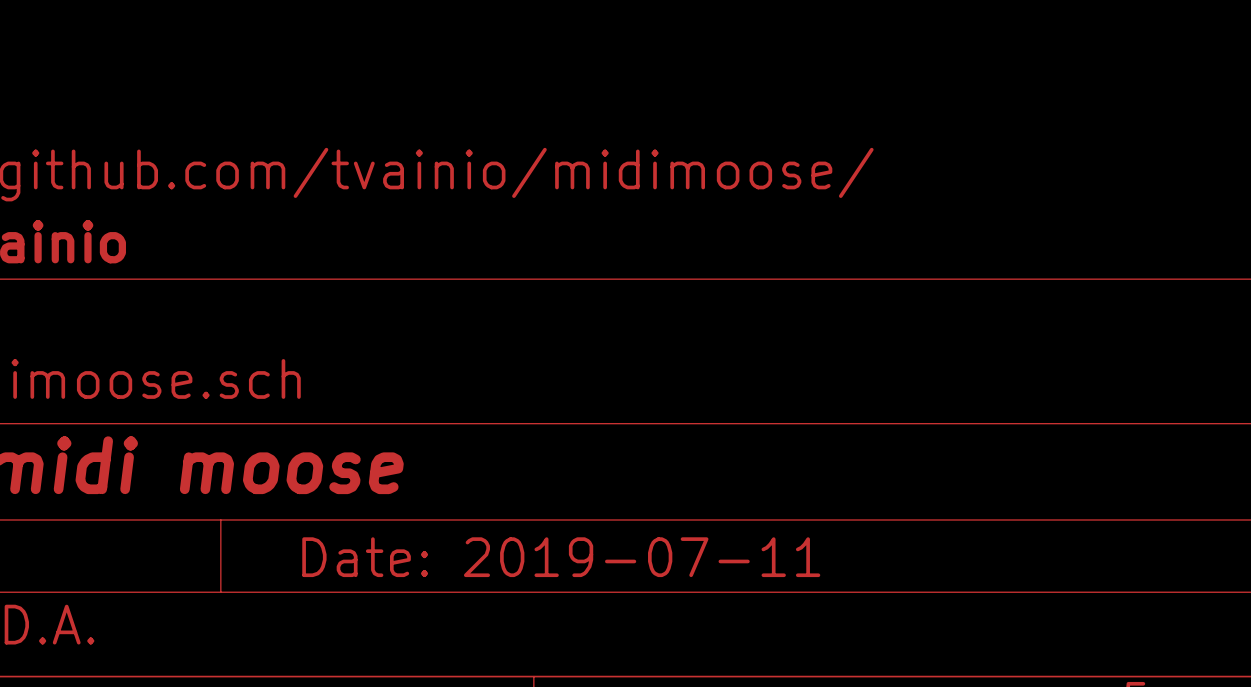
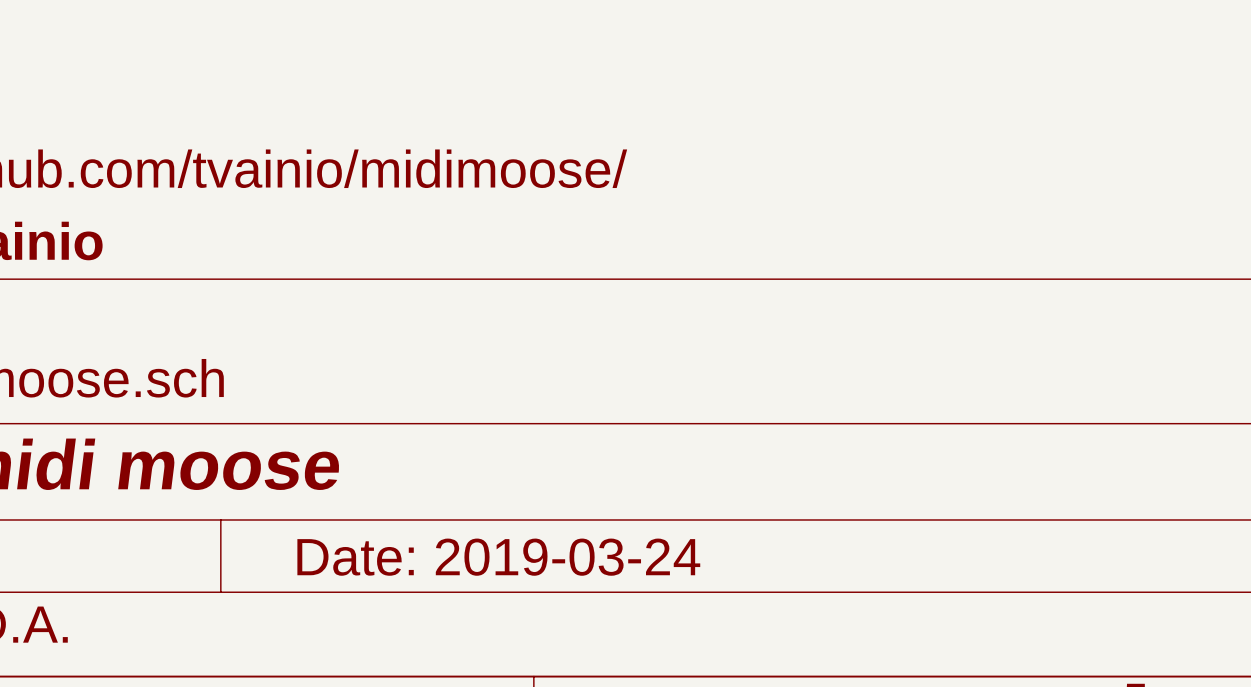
title block: Date: 2019-07-11 (561, 557) -> Date: 2019-03-24 (498, 557)

